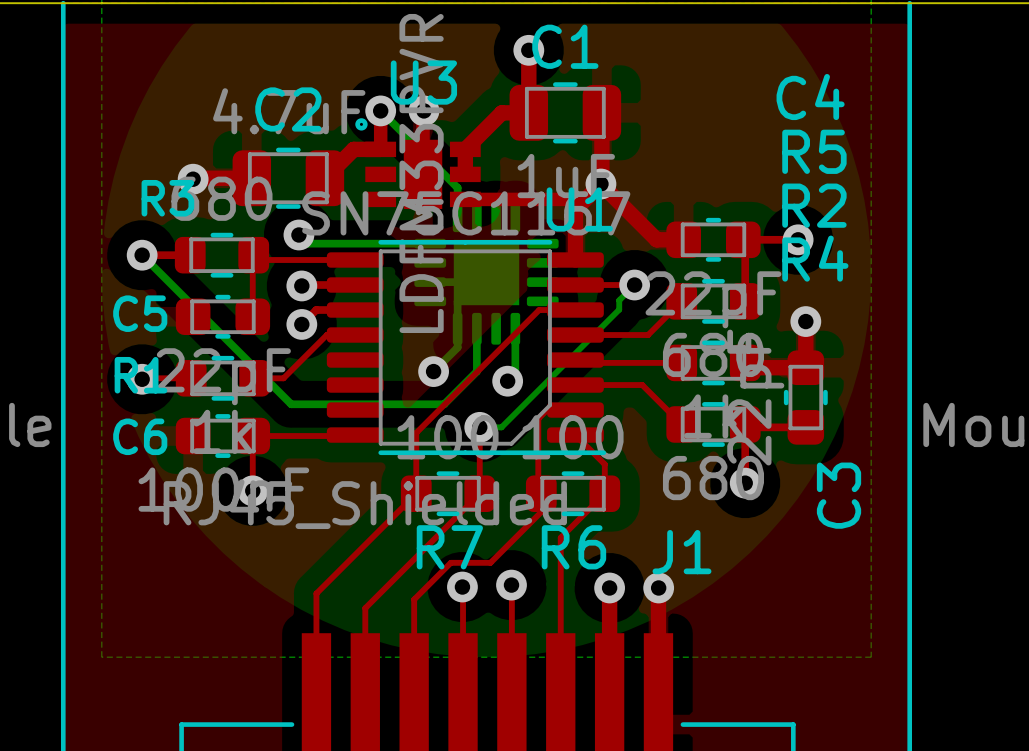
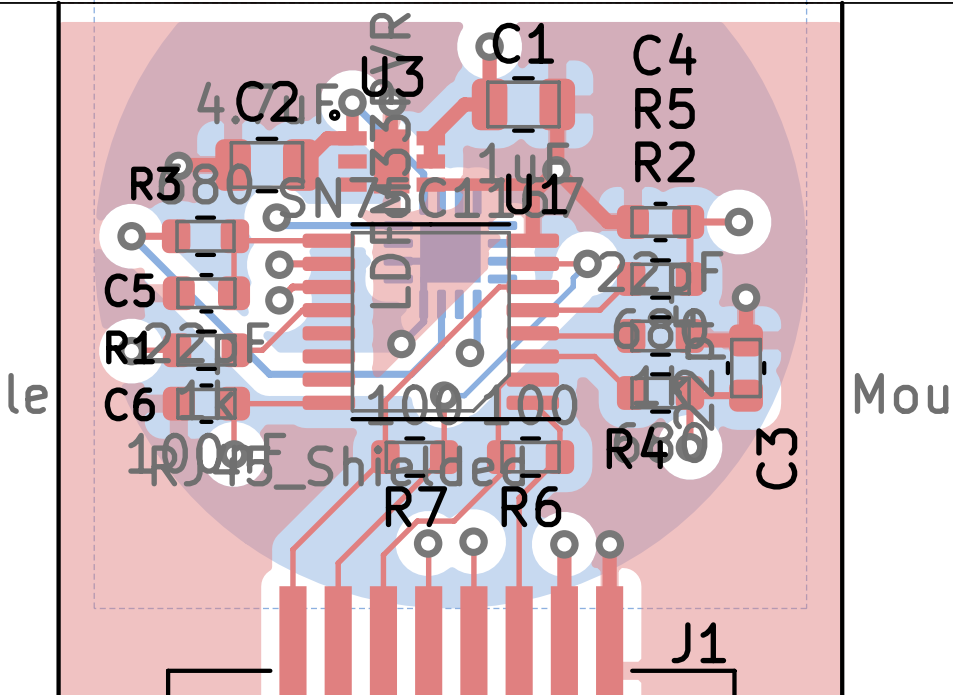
C4 name position: C4 (810, 97) -> C4 (664, 54)
R5 name position: R5 (814, 151) -> R5 (664, 108)
R2 name position: R2 (814, 205) -> R2 (664, 161)
R4 name position: R4 (815, 258) -> R4 (637, 447)
J1 name position: J1 (681, 552) -> J1 (698, 642)

